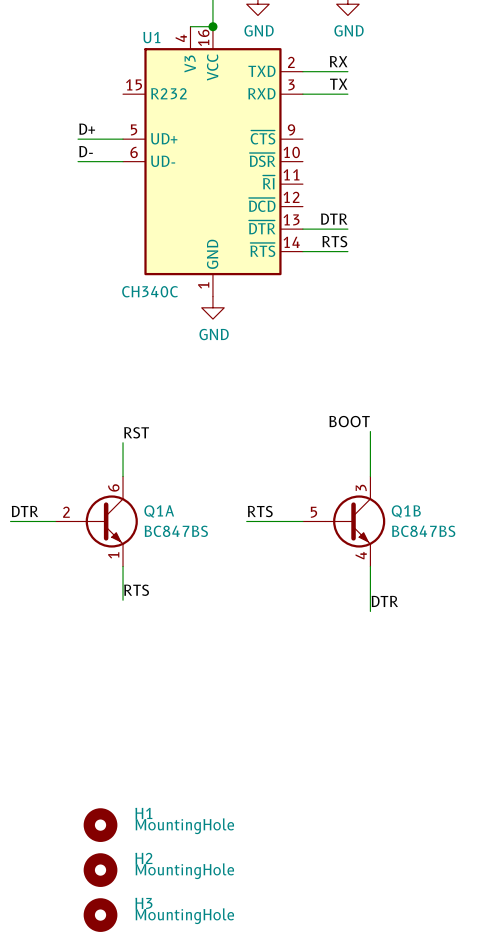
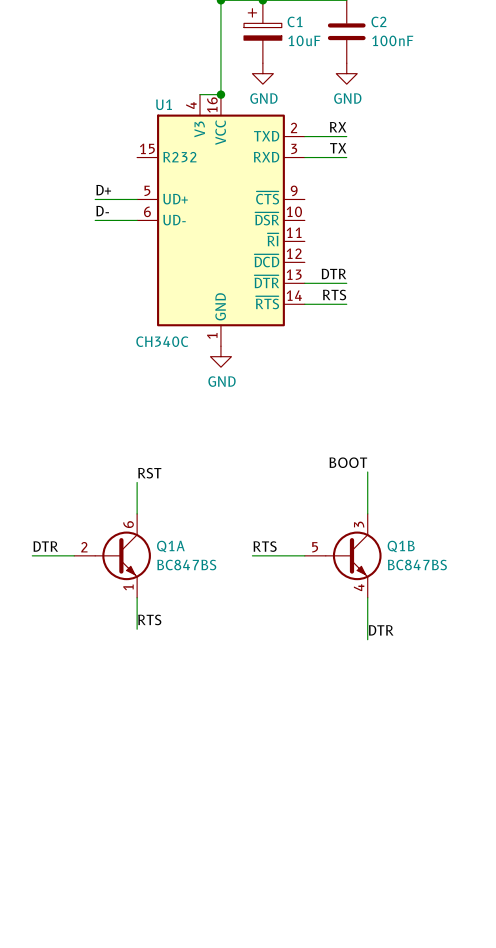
H1: MountingHole (100, 825) -> none
H2: MountingHole (100, 870) -> none
H3: MountingHole (100, 915) -> none

